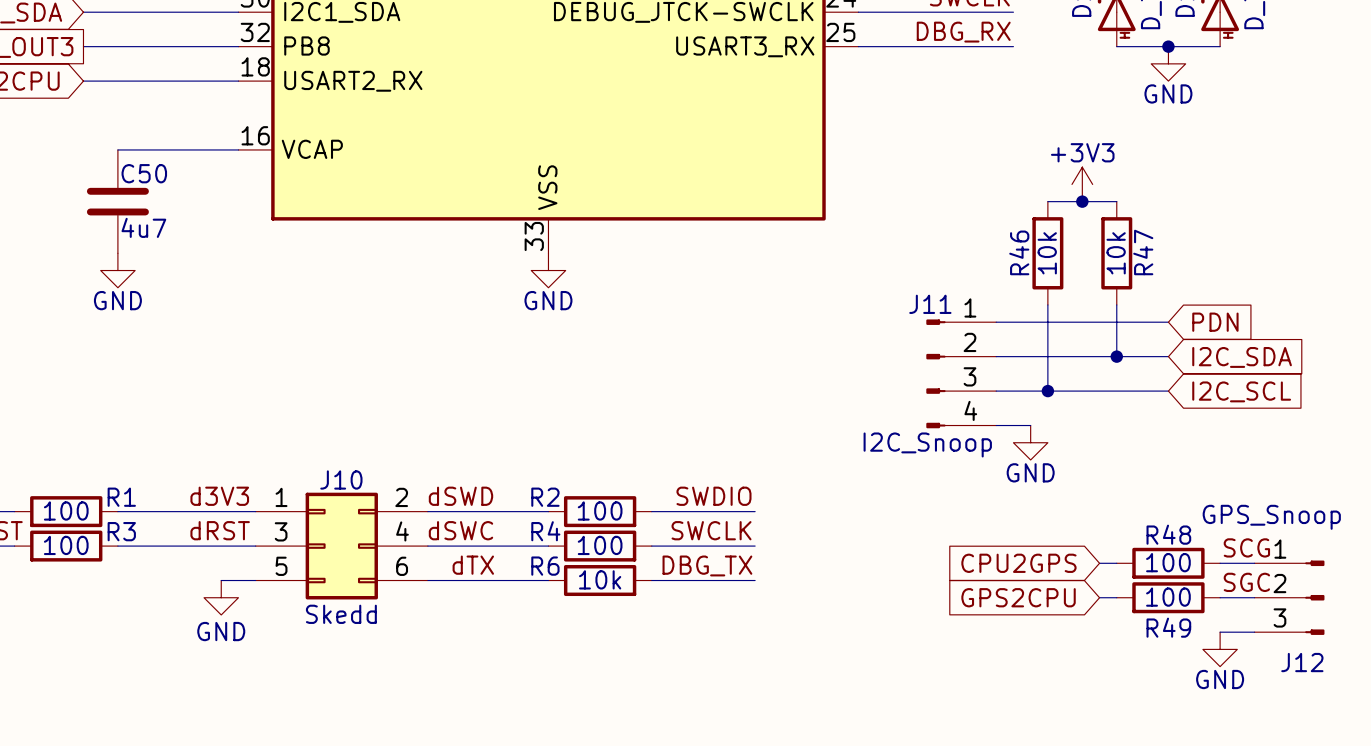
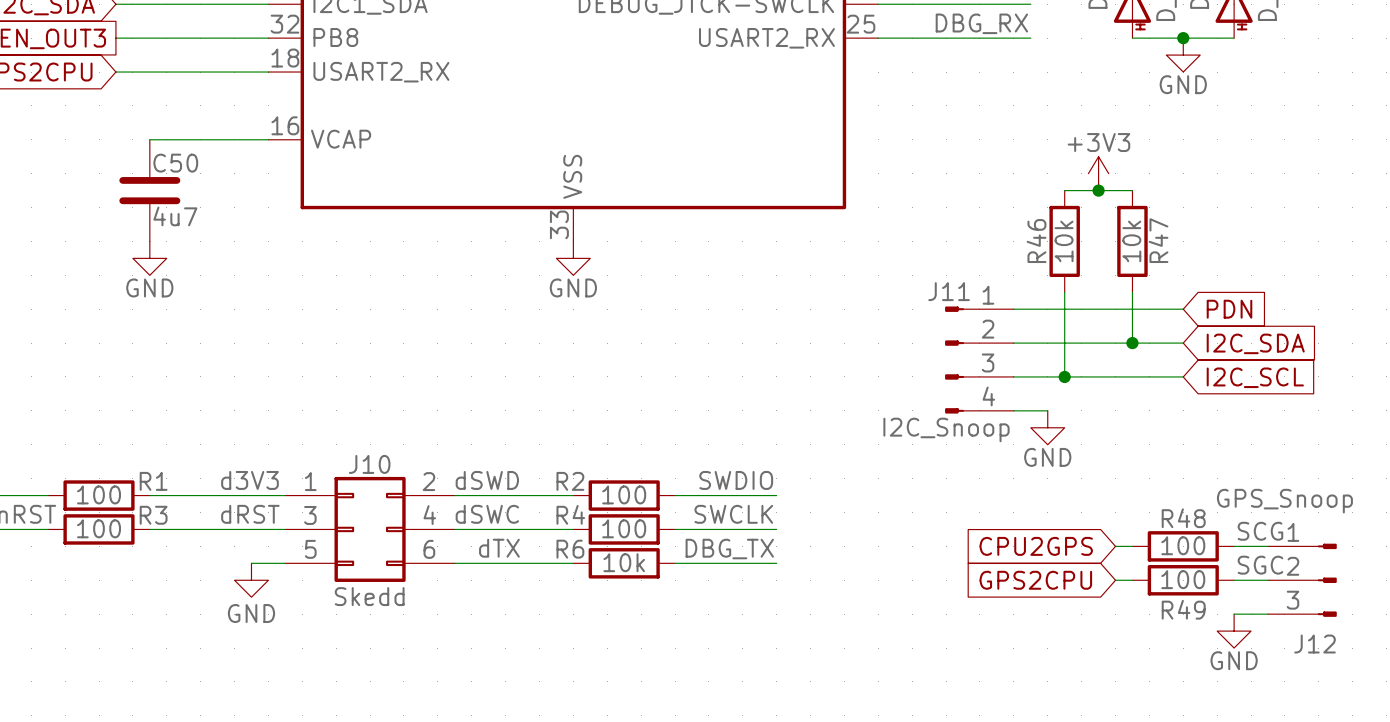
part pin name: USART3_RX (745, 46) -> USART2_RX (766, 38)

